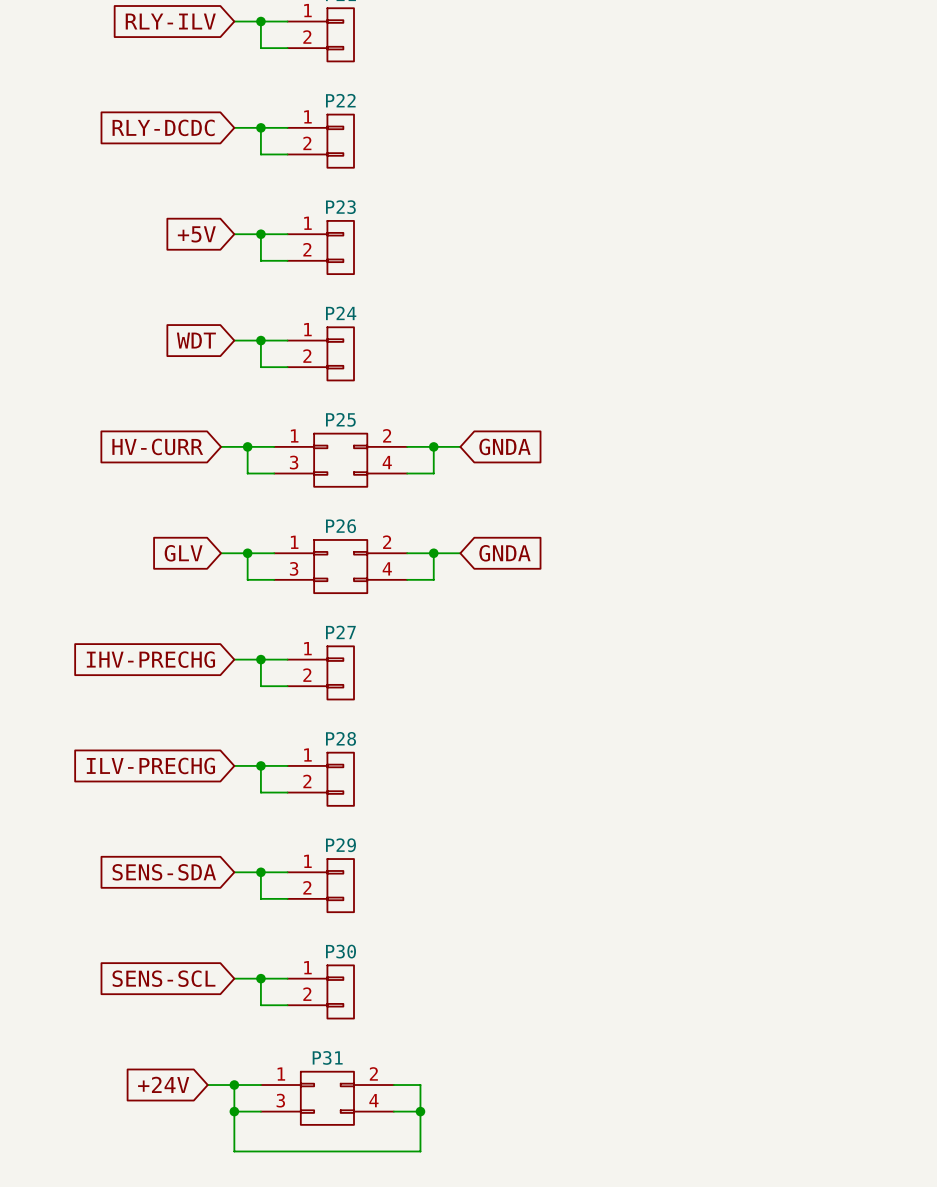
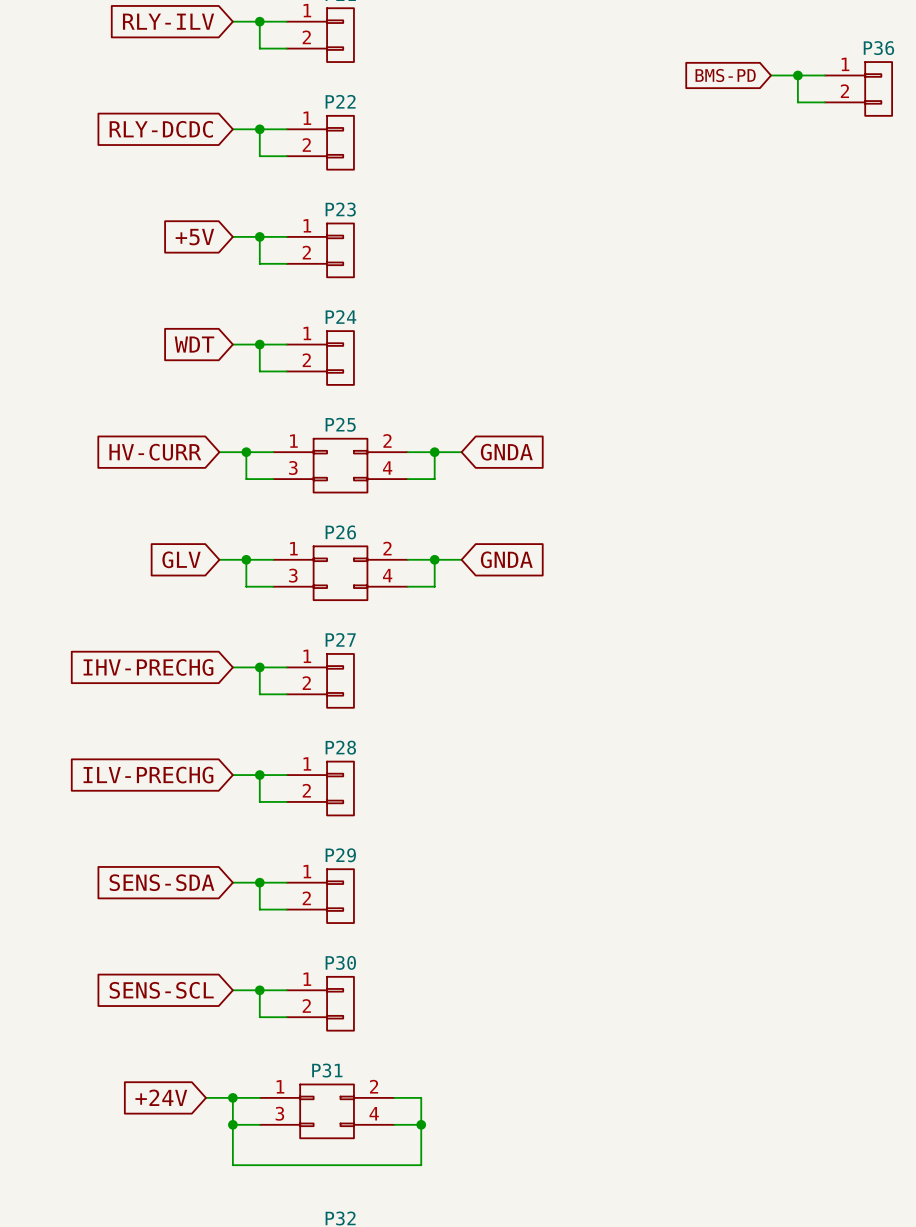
global label: none -> BMS-PD (725, 75)
wire: none -> (771, 75) (824, 75)
wire: none -> (797, 75) (797, 102) (824, 102)
junction: none -> (797, 75)
P36: none -> (858, 88)

